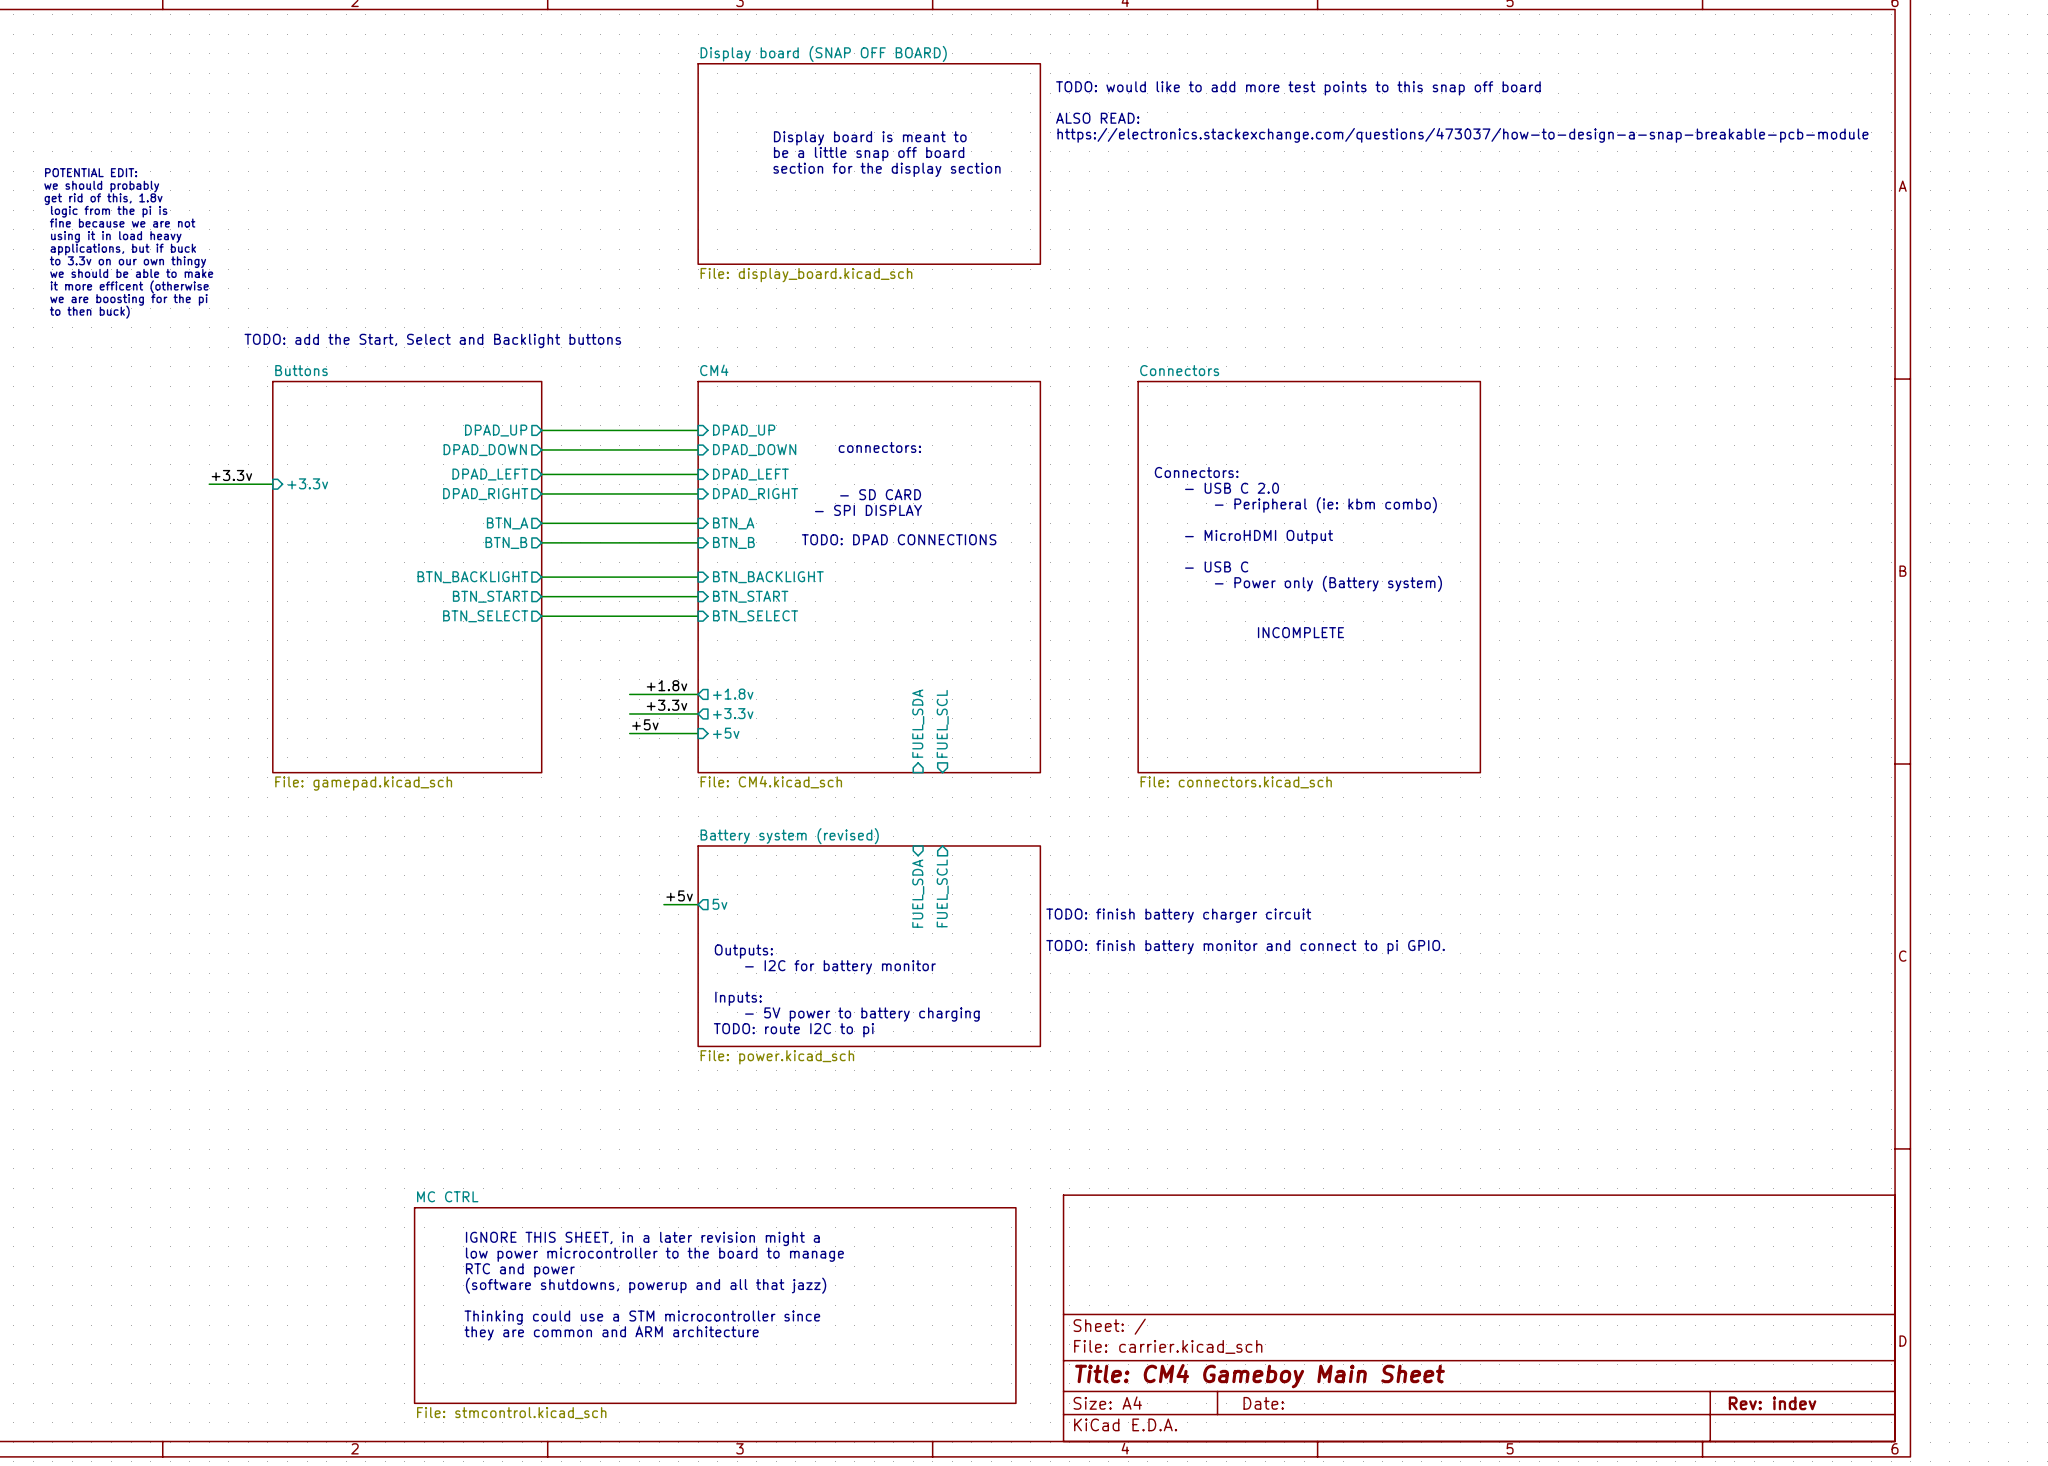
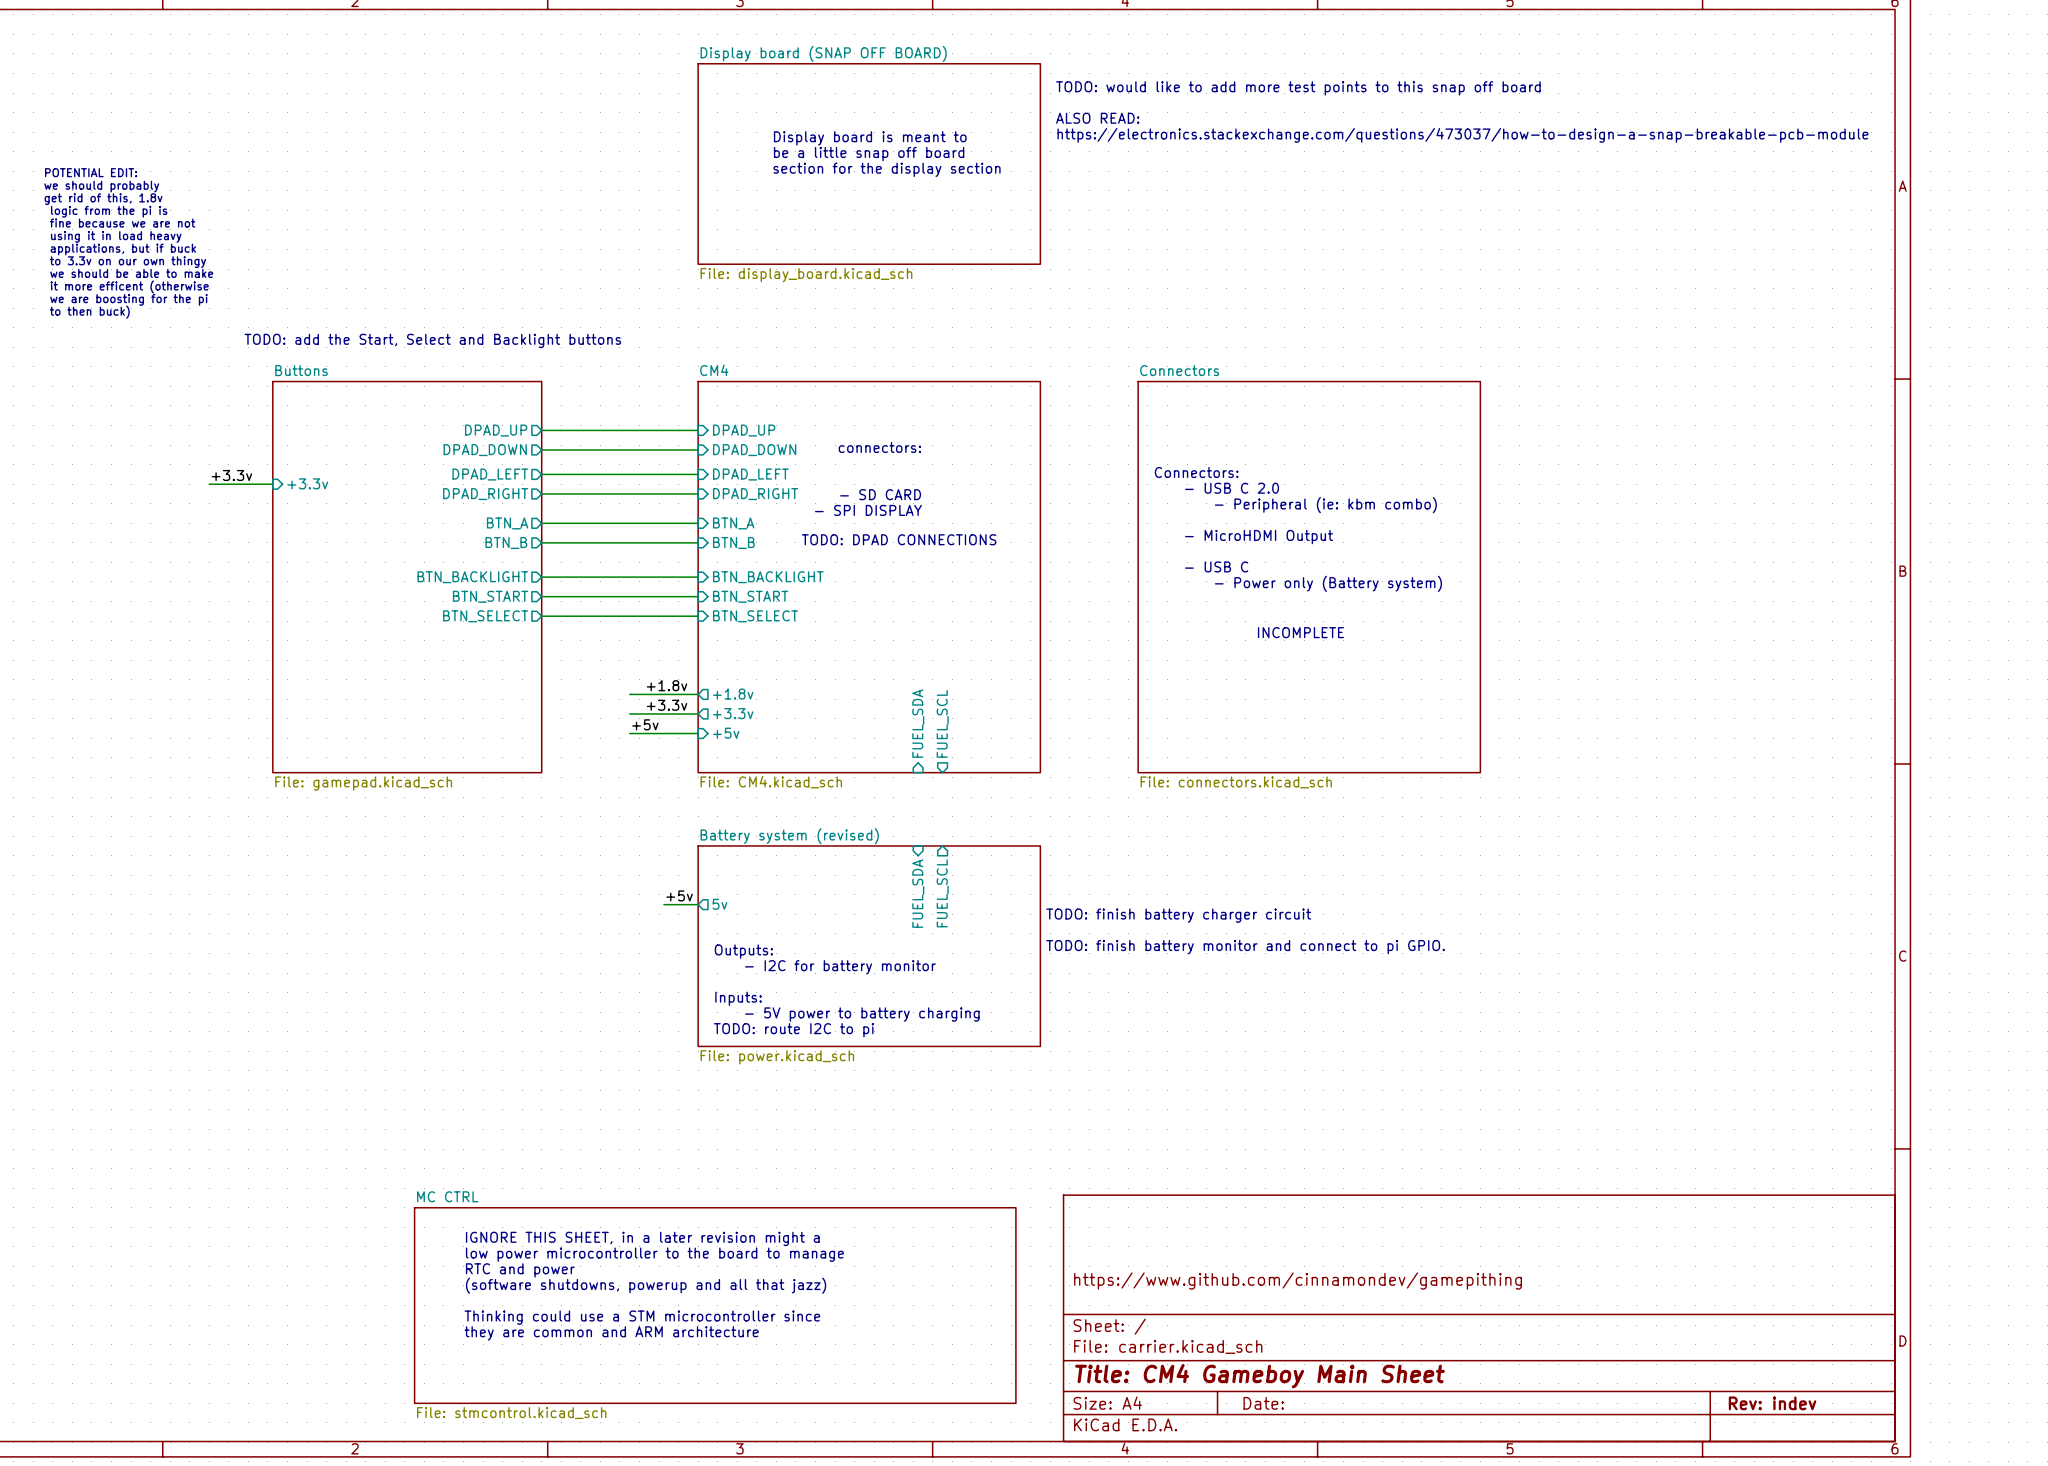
title block: none -> https://www.github.com/cinnamondev/gamepithing (1298, 1281)

